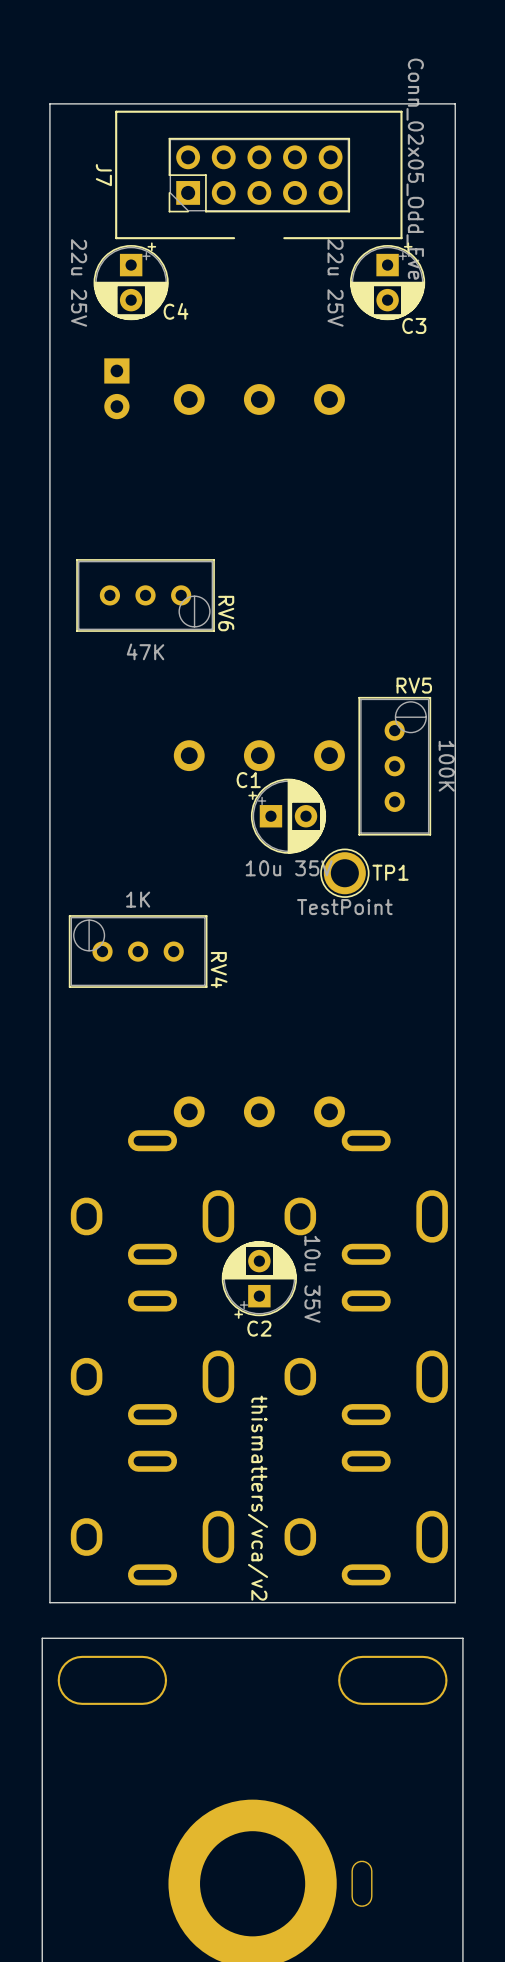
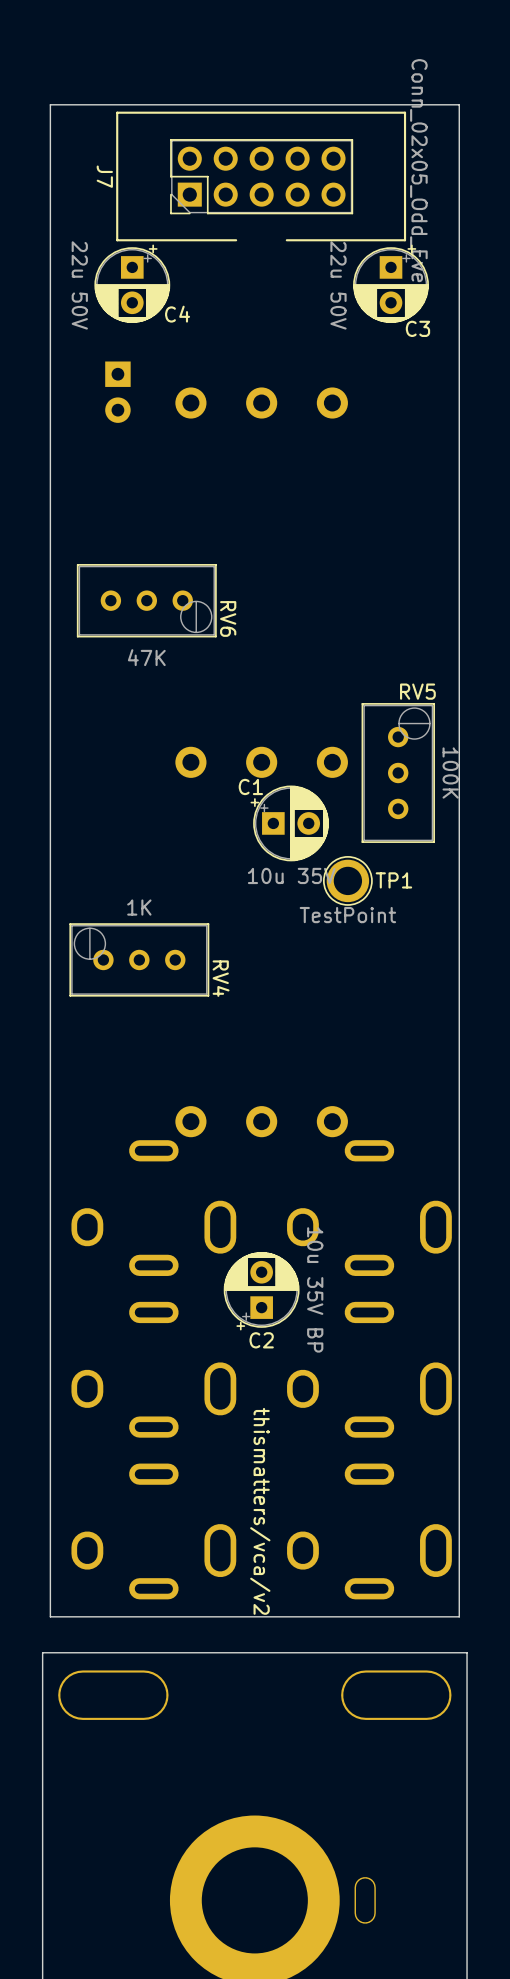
C4 value: 22u 25V (79, 282) -> 22u 50V (79, 285)
C3 value: 22u 25V (335, 282) -> 22u 50V (338, 285)
C2 value: 10u 35V (312, 1279) -> 10u 35V BP (315, 1289)

